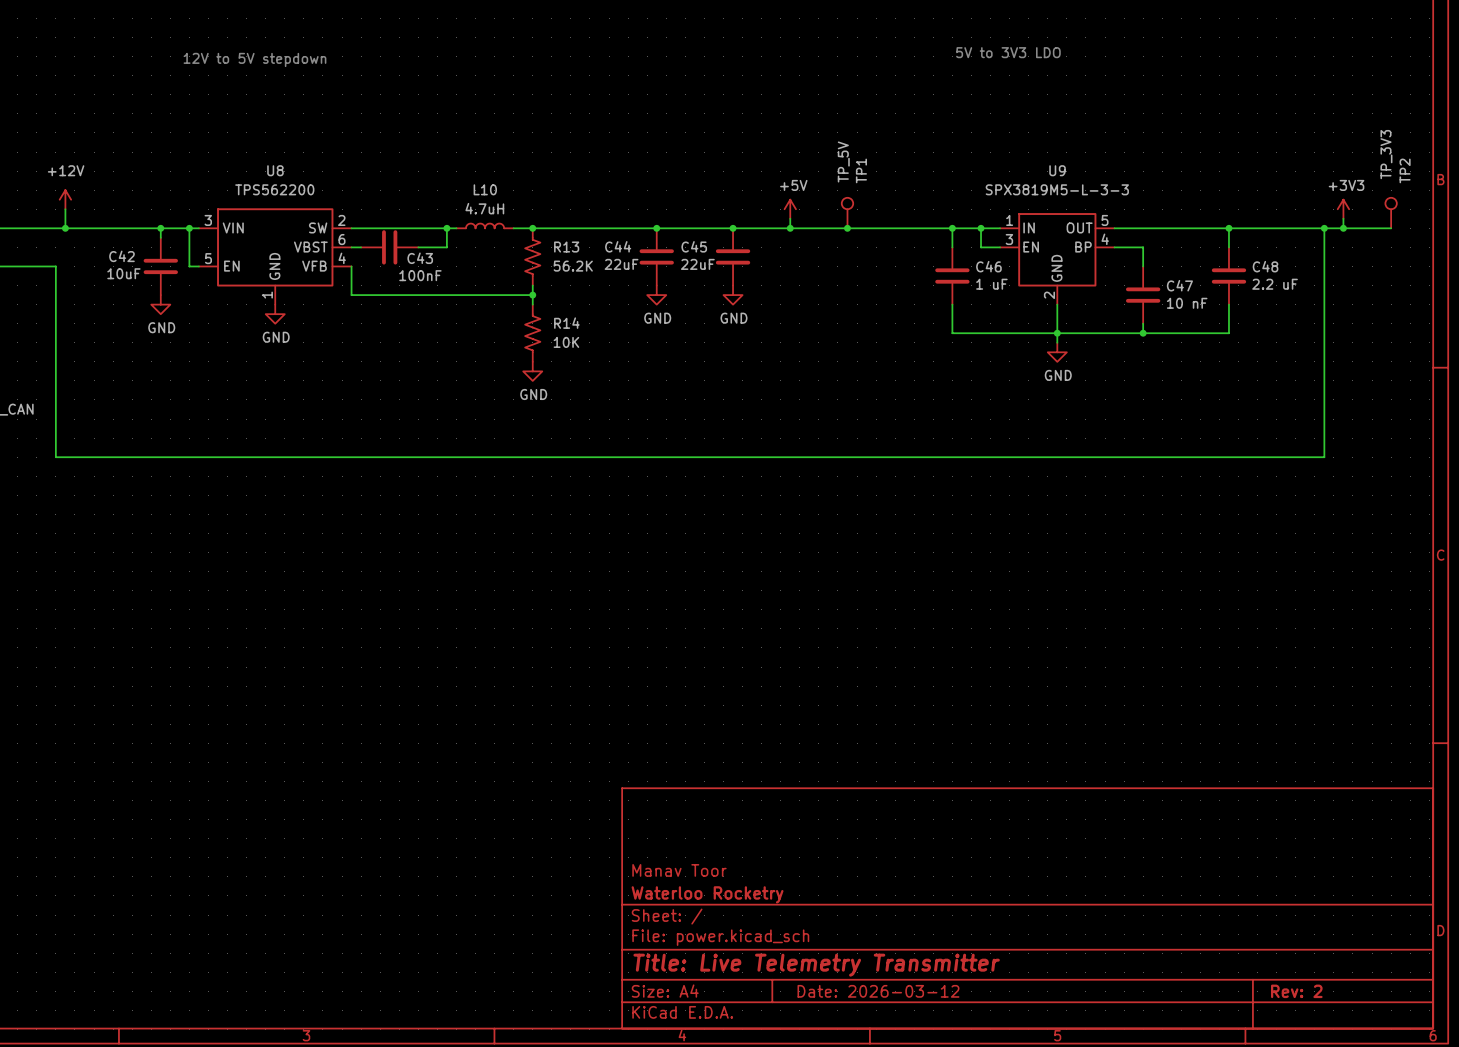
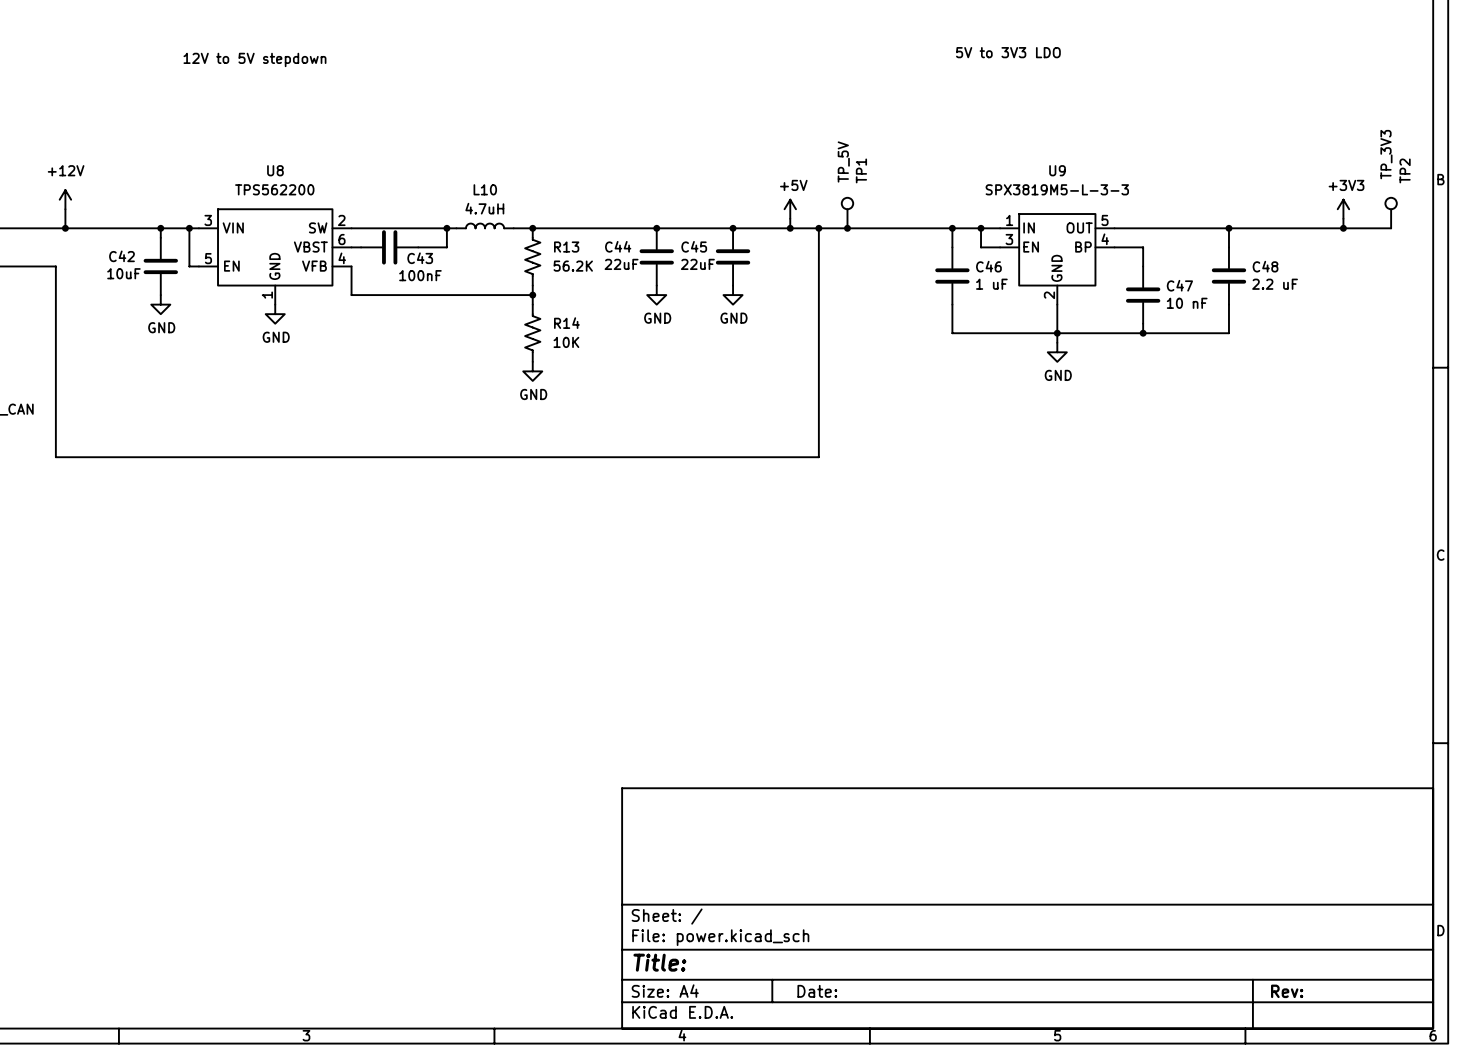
junction: none -> (818, 228)
wire: (1324, 228) (1324, 457) (818, 457) -> (818, 228) (818, 457)
junction: (1324, 228) -> none
title block: Manav Toor (679, 870) -> none
title block: Waterloo Rocketry (707, 894) -> none
title block: Title: Live Telemetry Transmitter (816, 965) -> Title: (659, 962)
title block: Date: 2026-03-12 (878, 991) -> Date: (817, 991)
title block: Rev: 2 (1296, 991) -> Rev: (1287, 991)

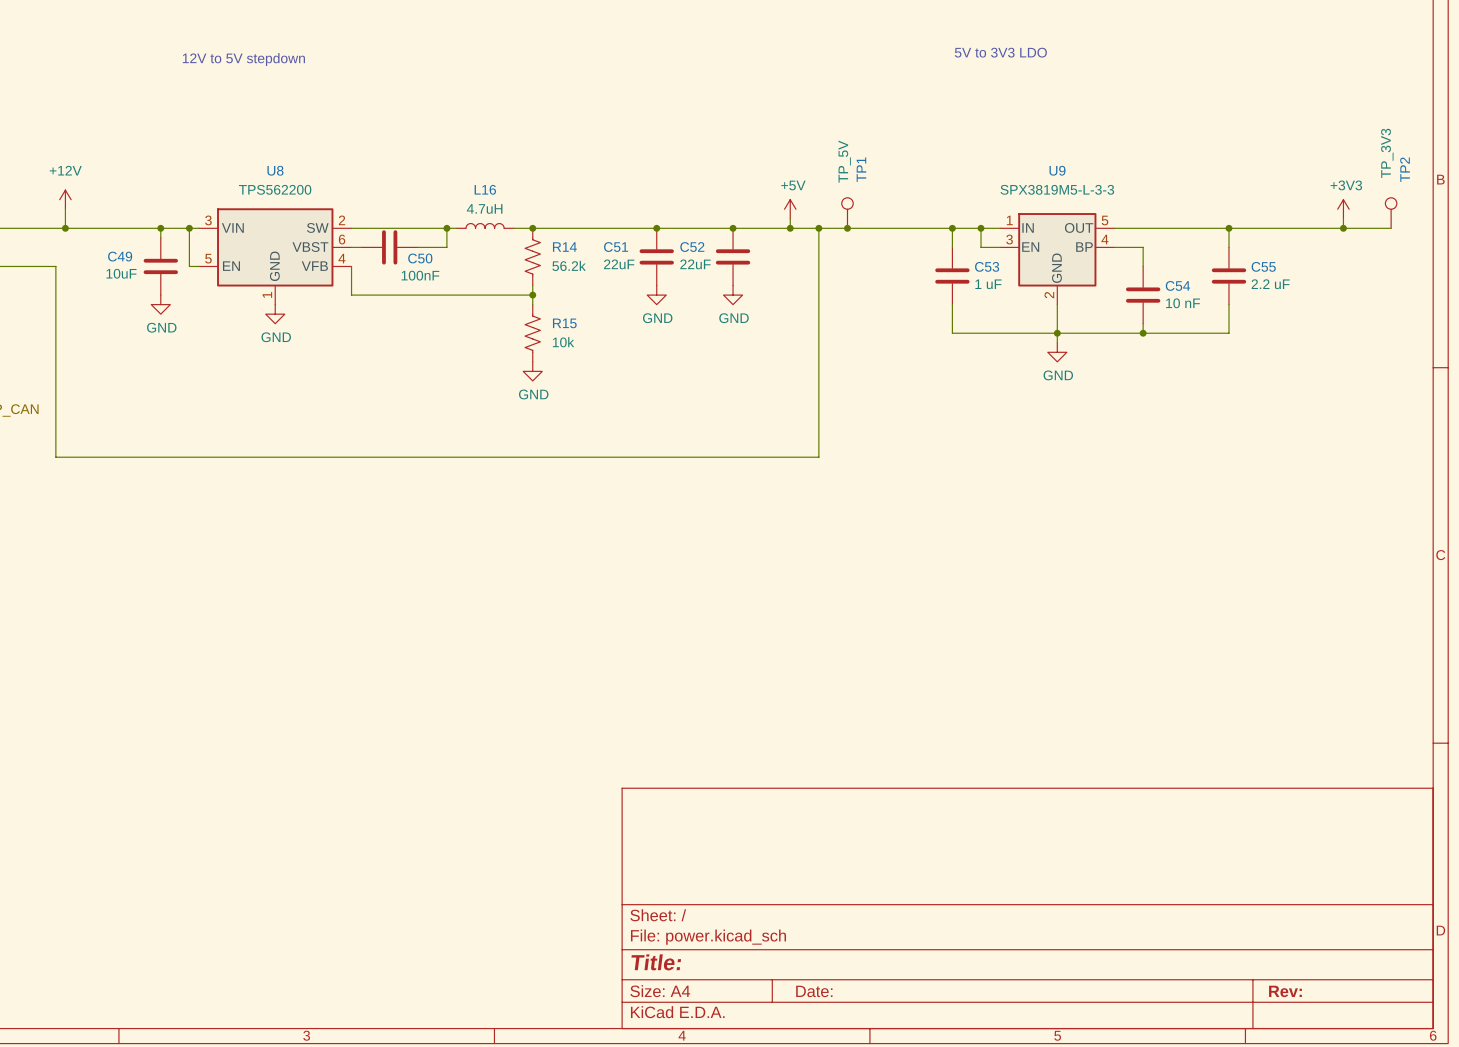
L10 name: L10 (485, 189) -> L16 (485, 189)
C44 name: C44 (618, 246) -> C51 (616, 247)
C45 name: C45 (694, 246) -> C52 (692, 247)
R13 name: R13 (566, 247) -> R14 (564, 247)
C42 name: C42 (121, 256) -> C49 (120, 256)
C43 name: C43 (420, 258) -> C50 (420, 258)
R13 value: 56.2K (573, 266) -> 56.2k (569, 265)
C46 name: C46 (988, 266) -> C53 (987, 266)
C48 name: C48 (1265, 266) -> C55 (1263, 266)
C47 name: C47 (1179, 285) -> C54 (1177, 285)
R14 name: R14 (566, 323) -> R15 (564, 323)
R14 value: 10K (566, 342) -> 10k (563, 342)

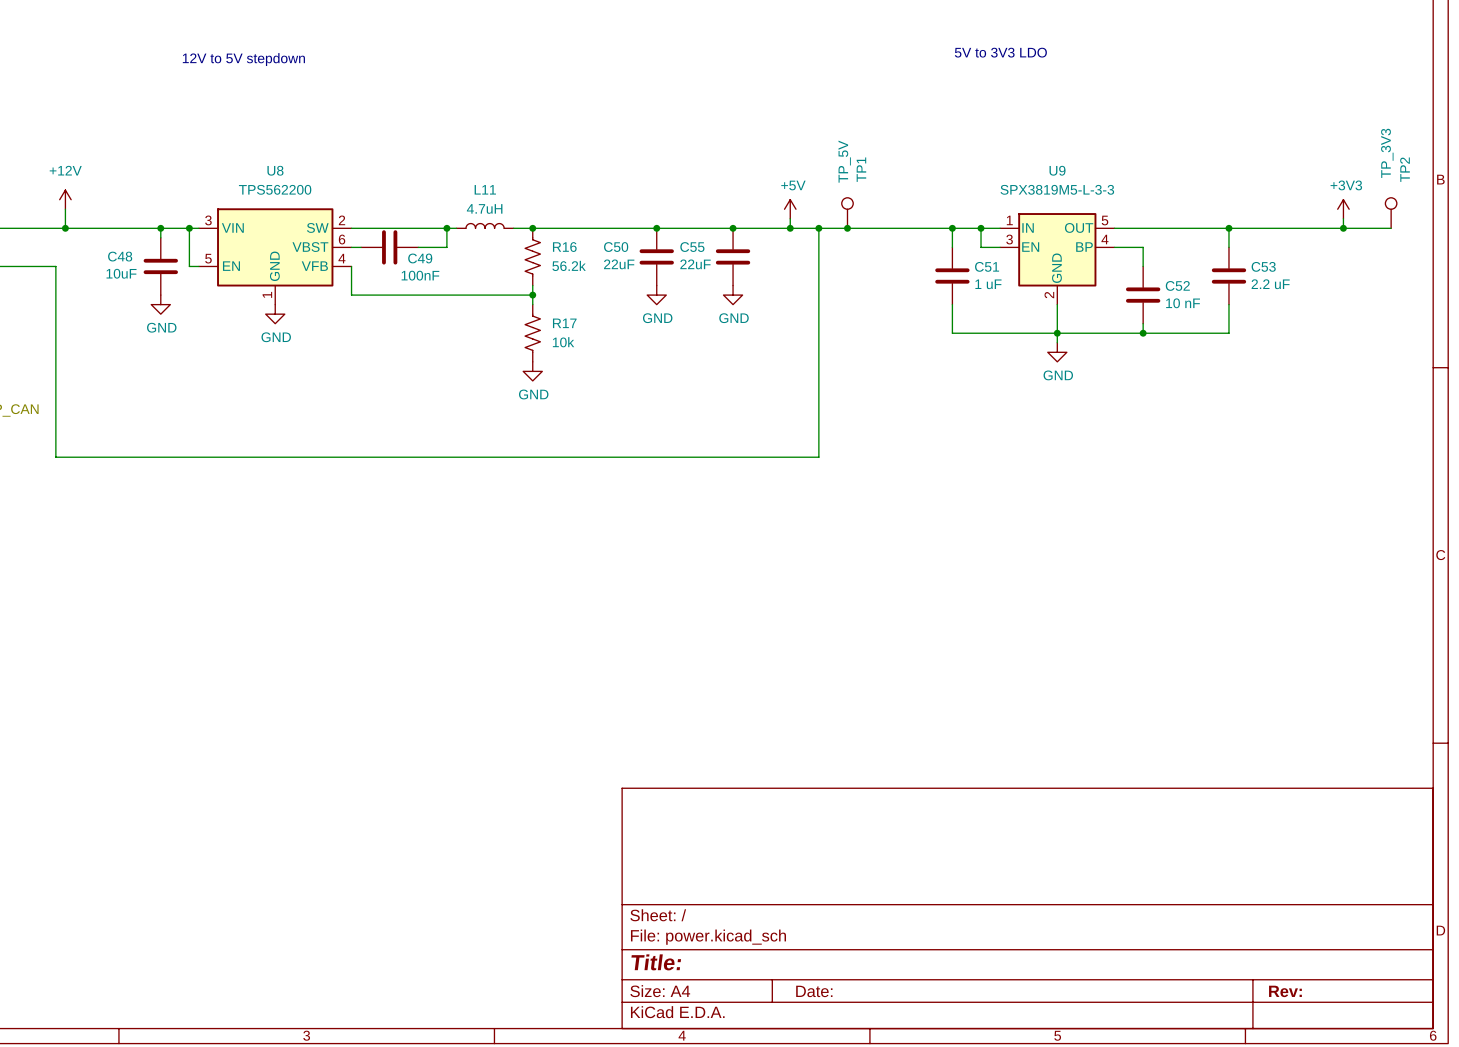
L16 name: L16 (485, 189) -> L11 (485, 189)
R14 name: R14 (564, 247) -> R16 (564, 247)
C51 name: C51 (616, 247) -> C50 (616, 247)
C52 name: C52 (692, 247) -> C55 (692, 247)
C49 name: C49 (120, 256) -> C48 (120, 256)
C50 name: C50 (420, 258) -> C49 (420, 258)
C53 name: C53 (987, 266) -> C51 (987, 266)
C55 name: C55 (1263, 266) -> C53 (1263, 266)
C54 name: C54 (1177, 285) -> C52 (1177, 285)
R15 name: R15 (564, 323) -> R17 (564, 323)

